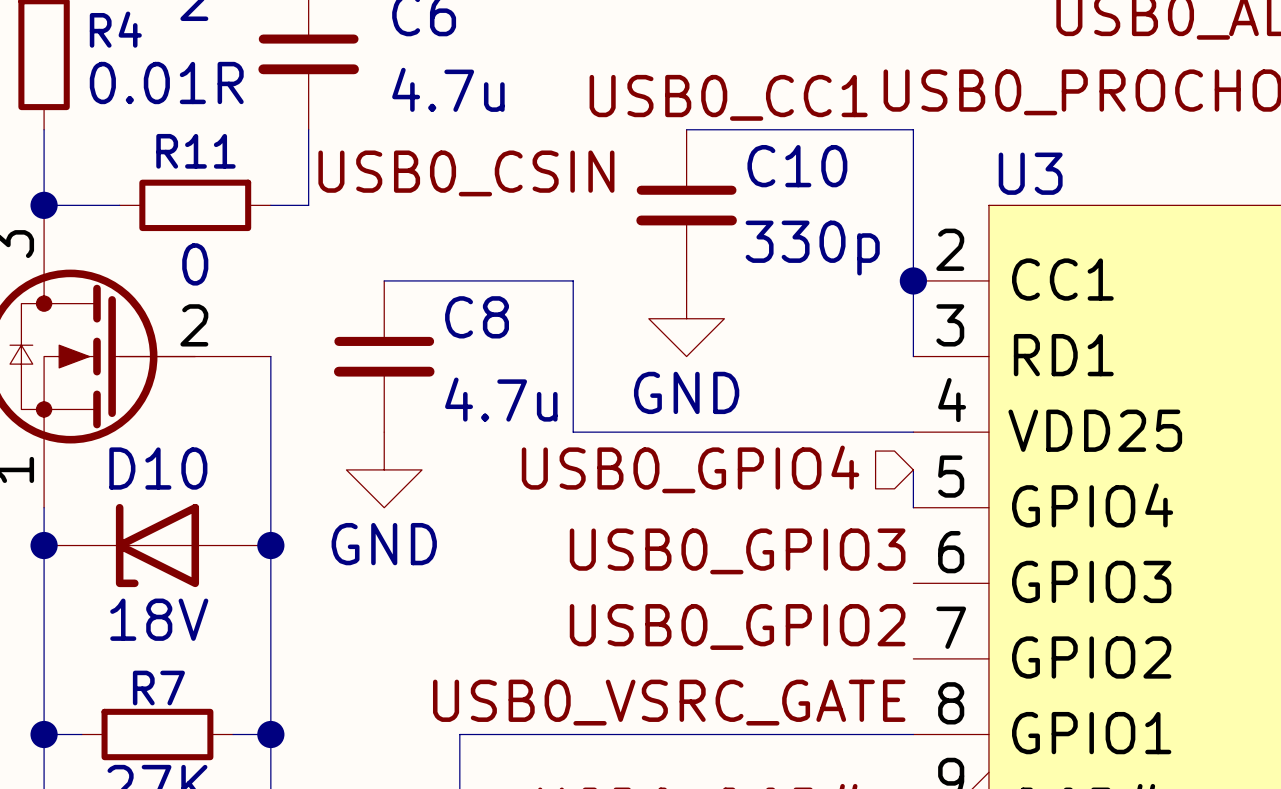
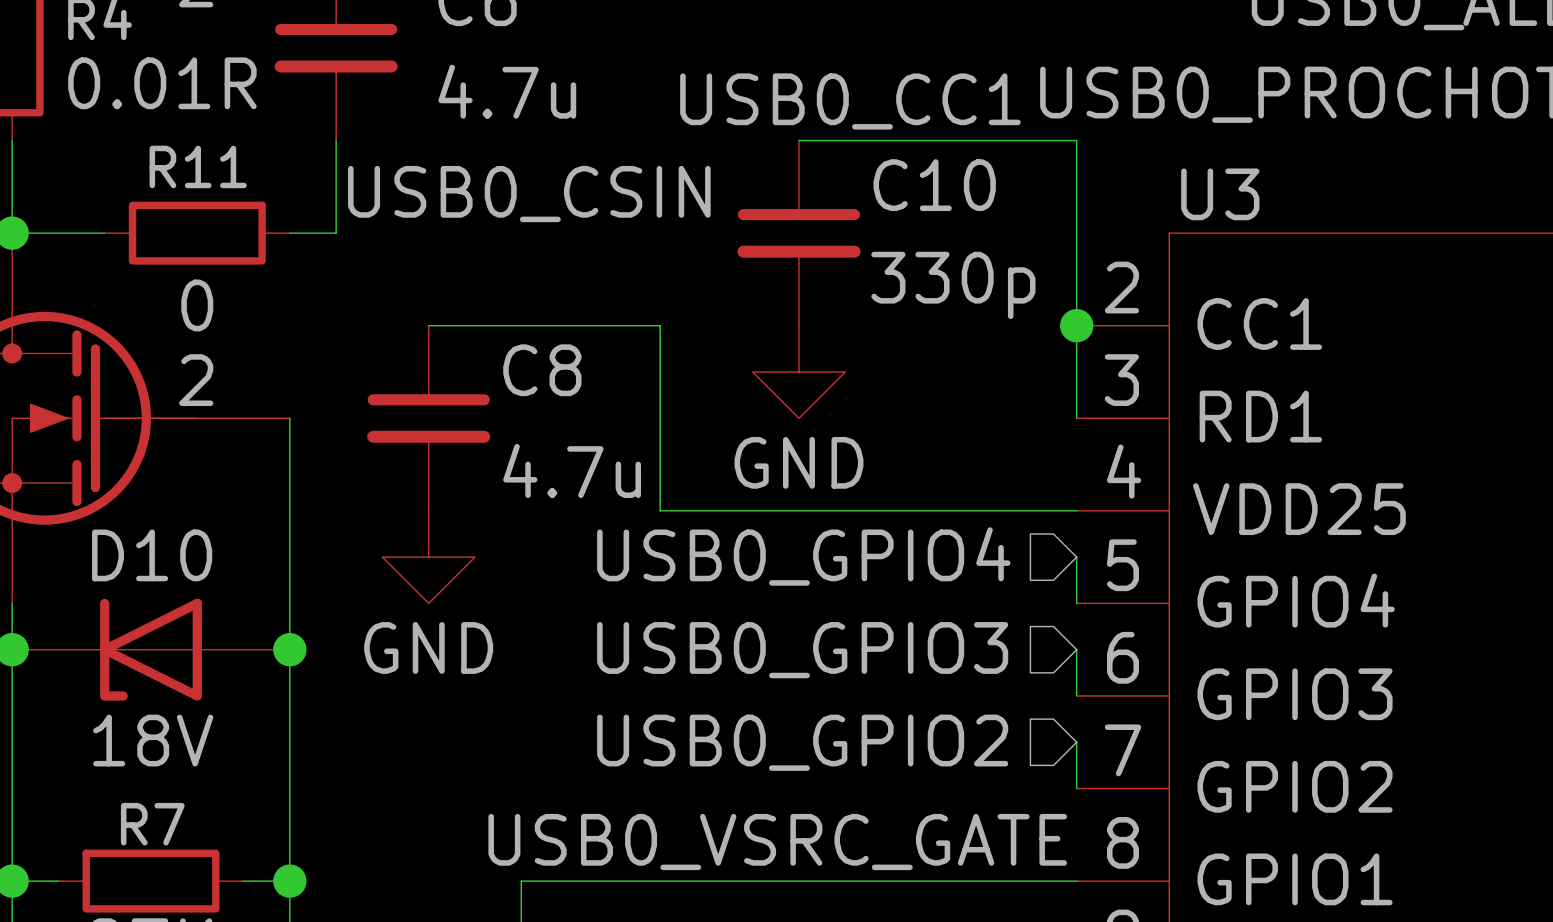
hierarchical label: none -> USB0_GPIO3 (802, 650)
wire: none -> (1076, 649) (1076, 695)
label: USB0_GPIO3 (737, 551) -> none
hierarchical label: none -> USB0_GPIO2 (802, 742)
wire: none -> (1076, 742) (1076, 788)
label: USB0_GPIO2 (737, 626) -> none

